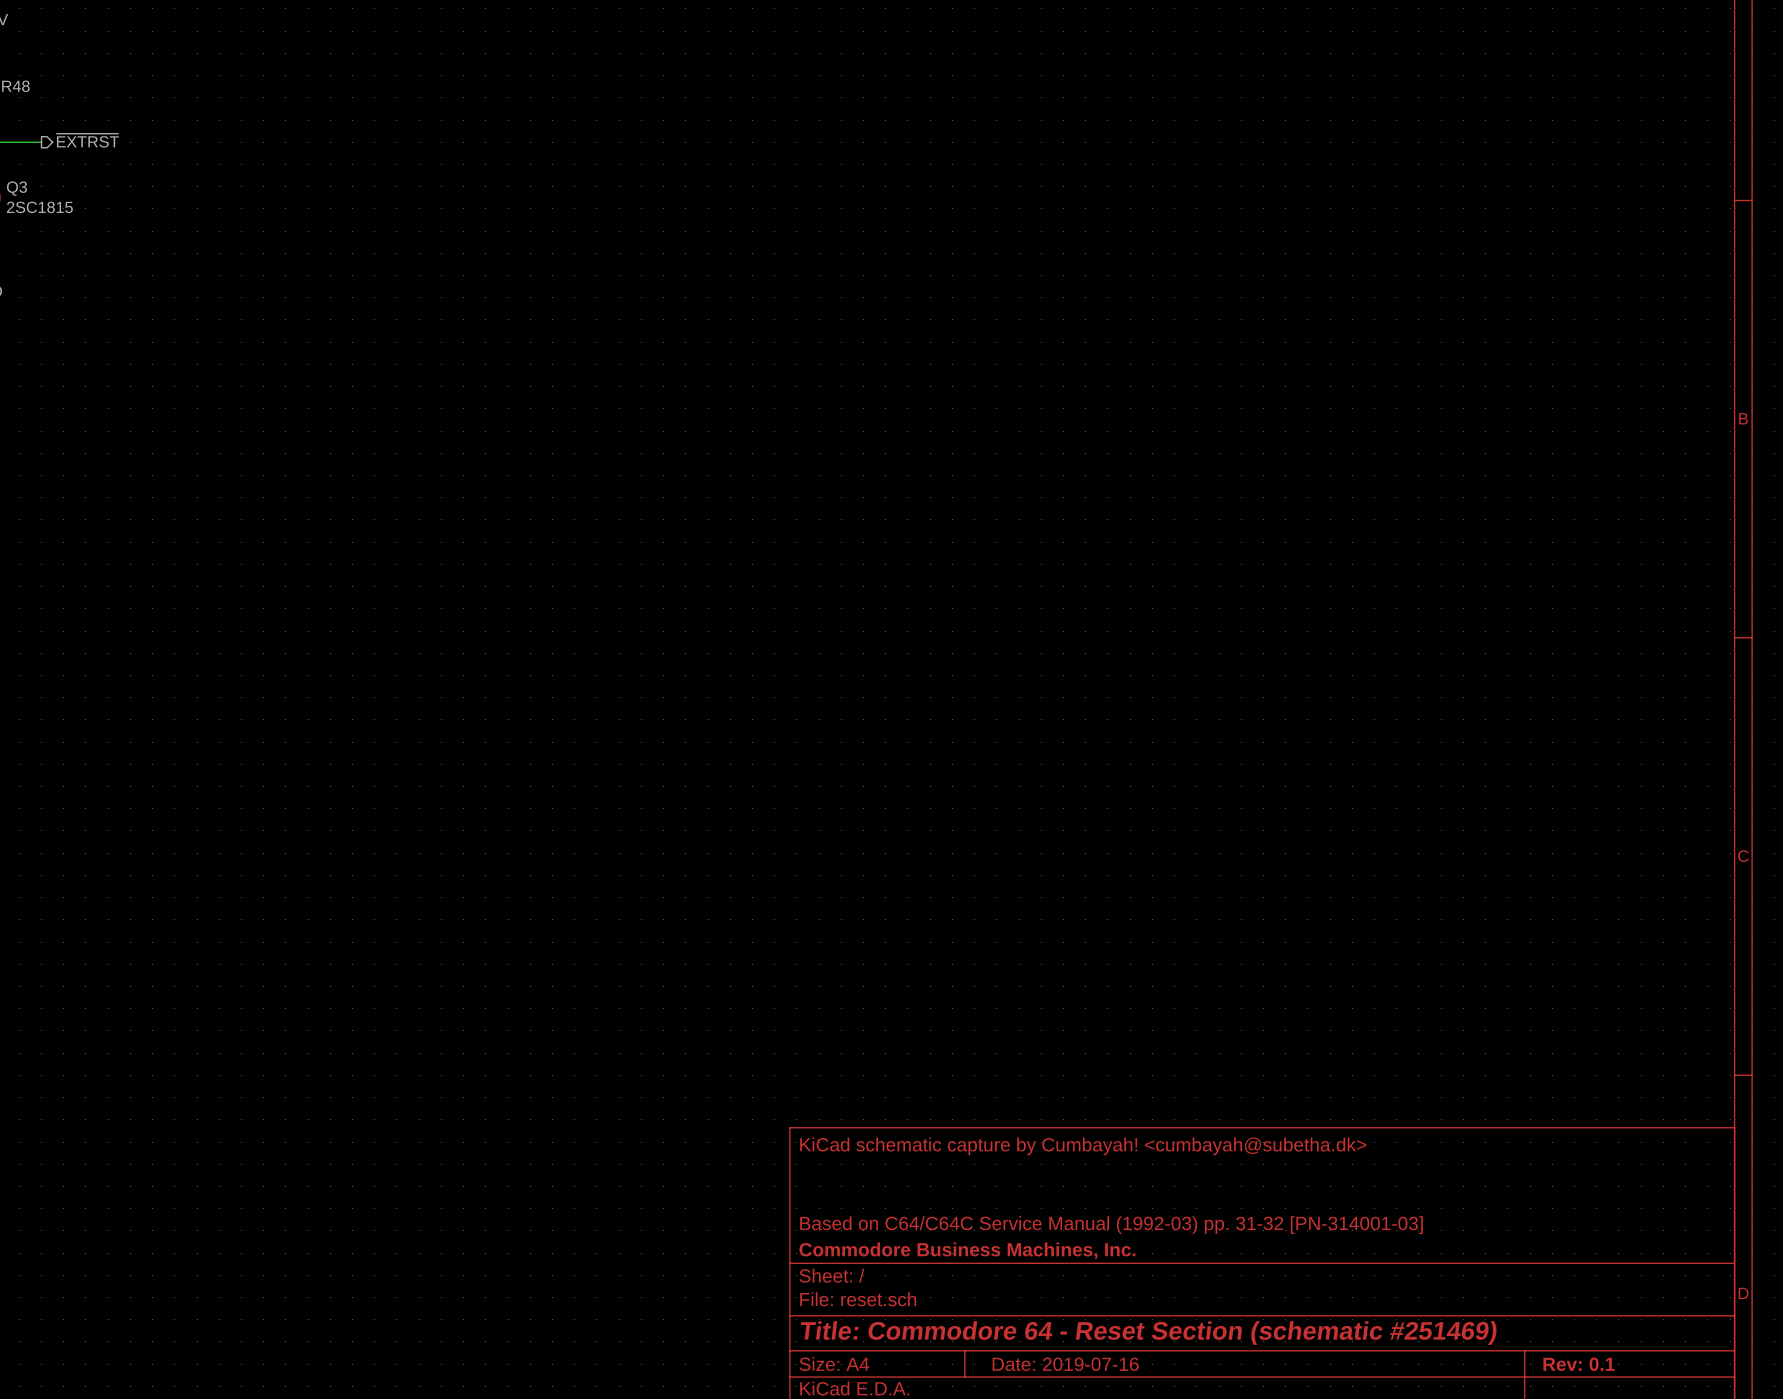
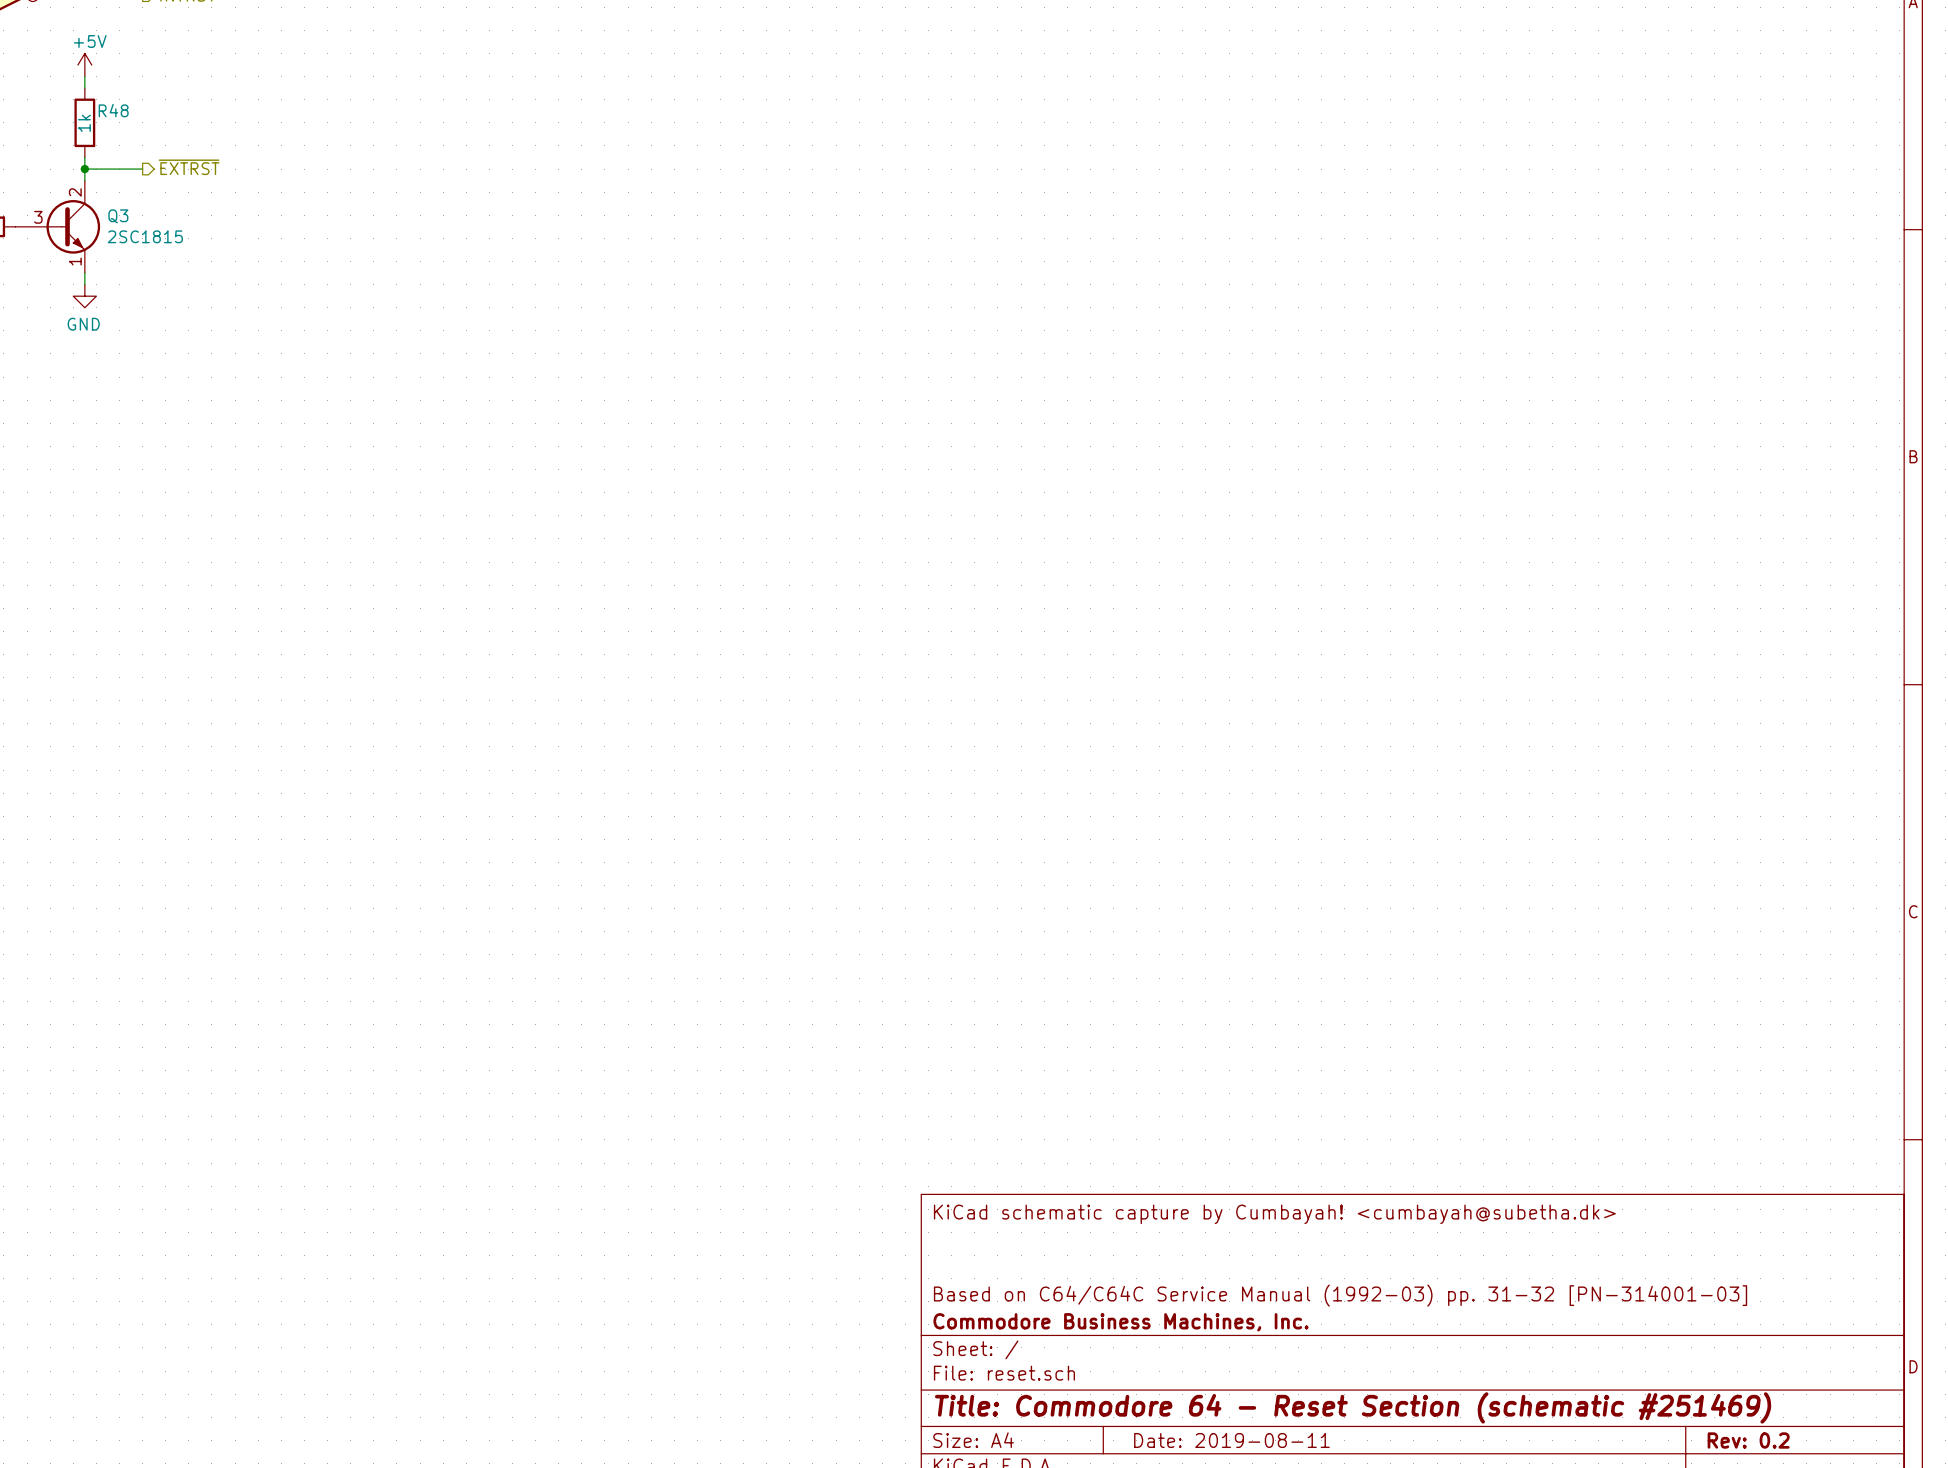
title block: Date: 2019-07-16 (1065, 1364) -> Date: 2019-08-11 (1231, 1440)
title block: Rev: 0.1 (1579, 1364) -> Rev: 0.2 (1748, 1440)

